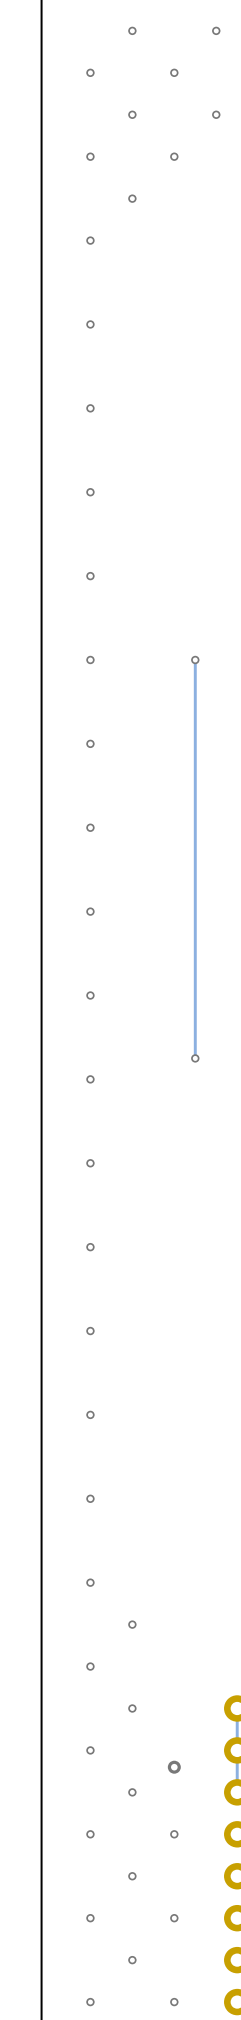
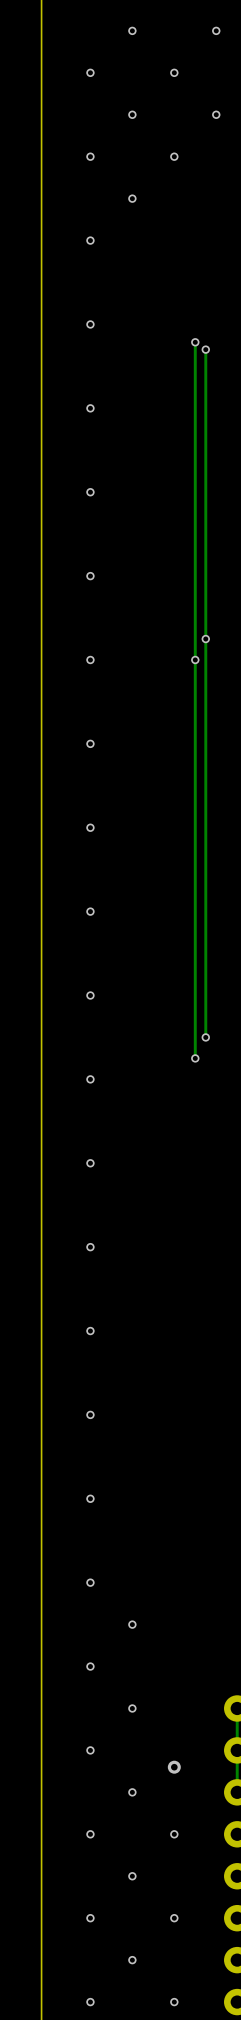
track: none -> (195, 342) (195, 659)
via: none -> (195, 342)
track: none -> (205, 349) (205, 1037)
via: none -> (205, 349)
via: none -> (205, 639)
via: none -> (205, 1037)

